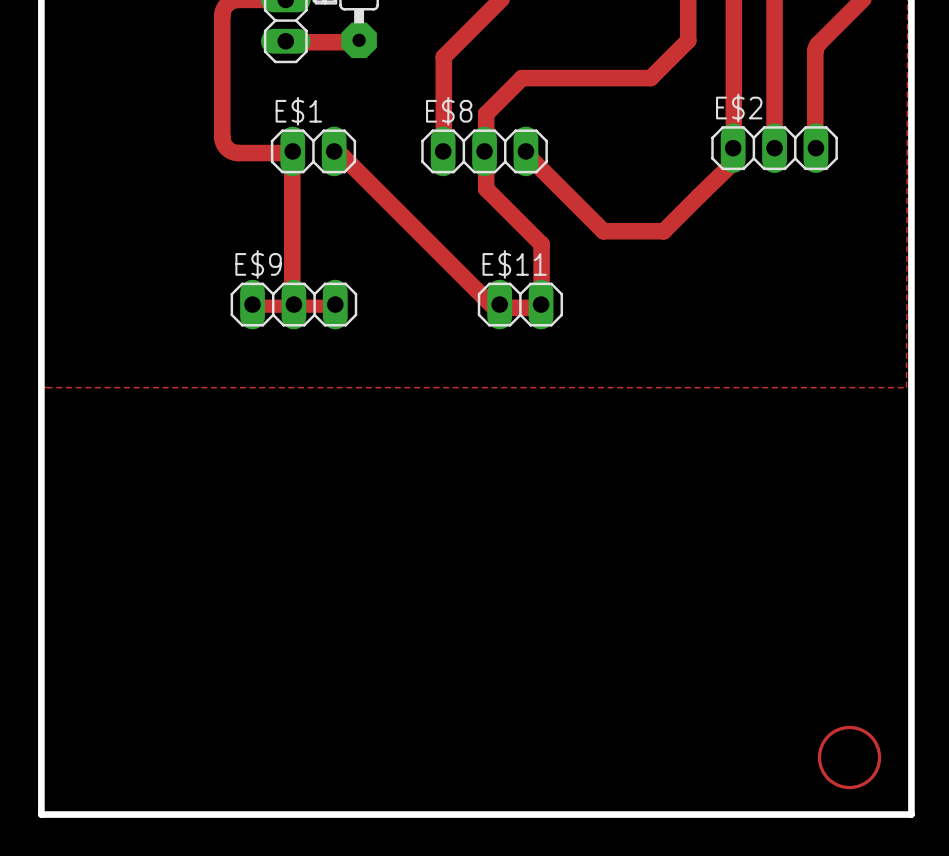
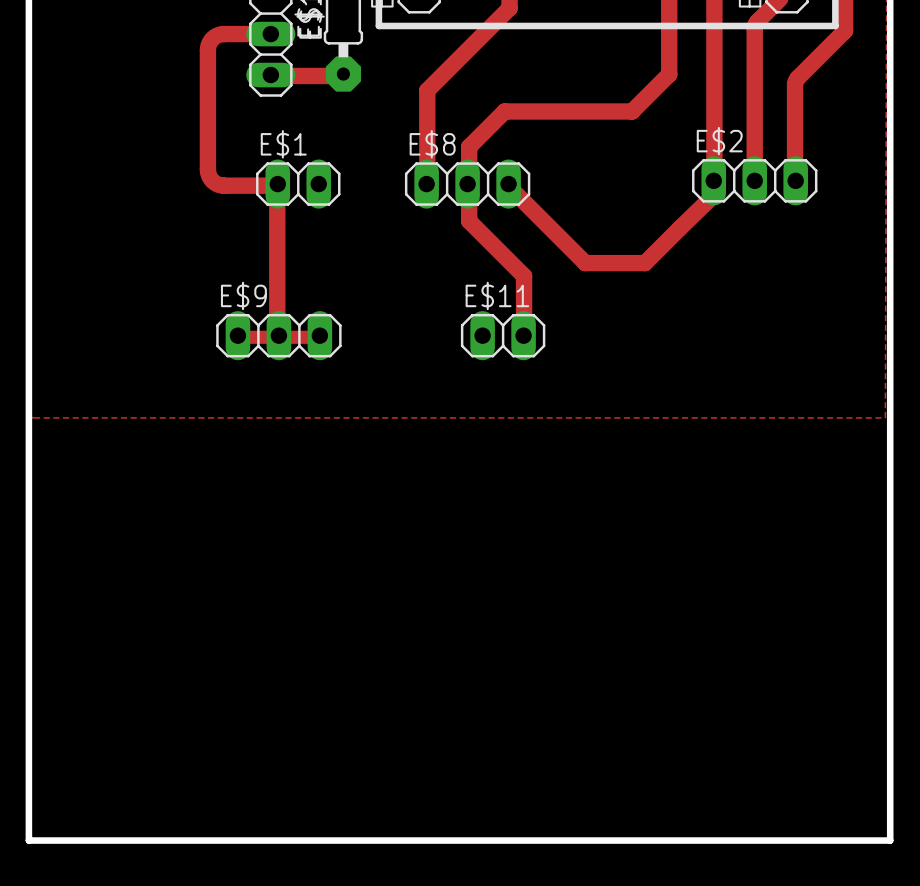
track: (336, 149) (494, 307) (543, 307) -> none
drawing: [817, 725, 882, 790] -> none

